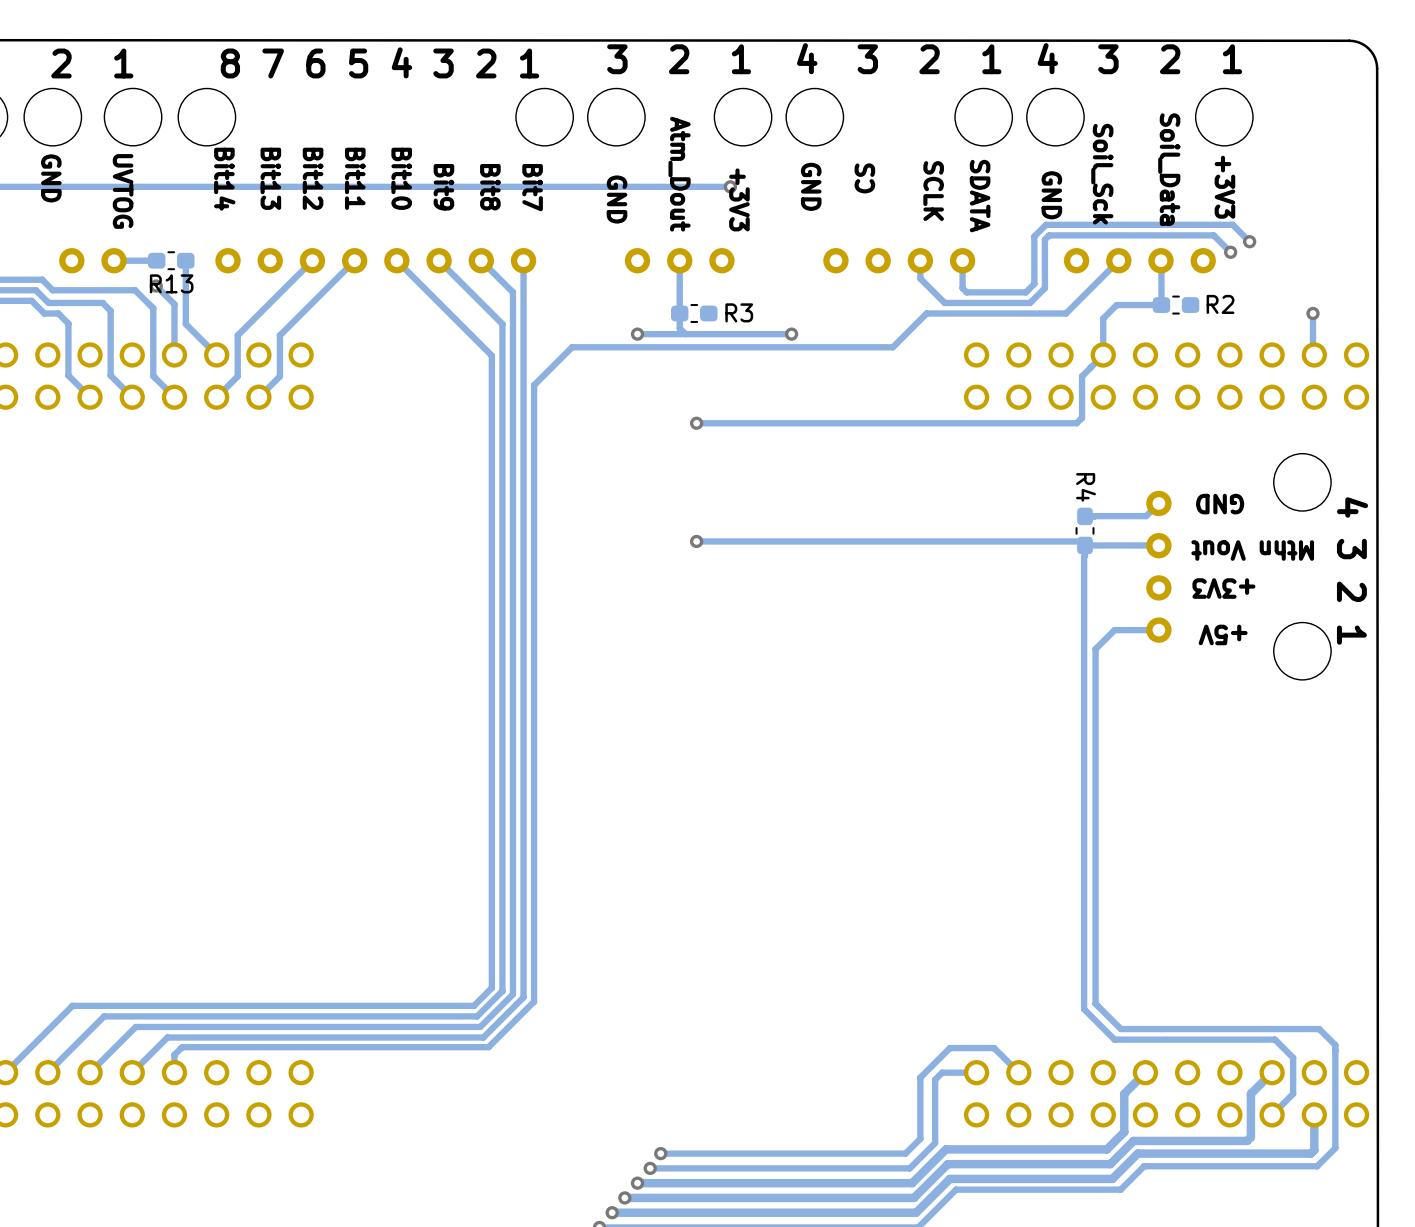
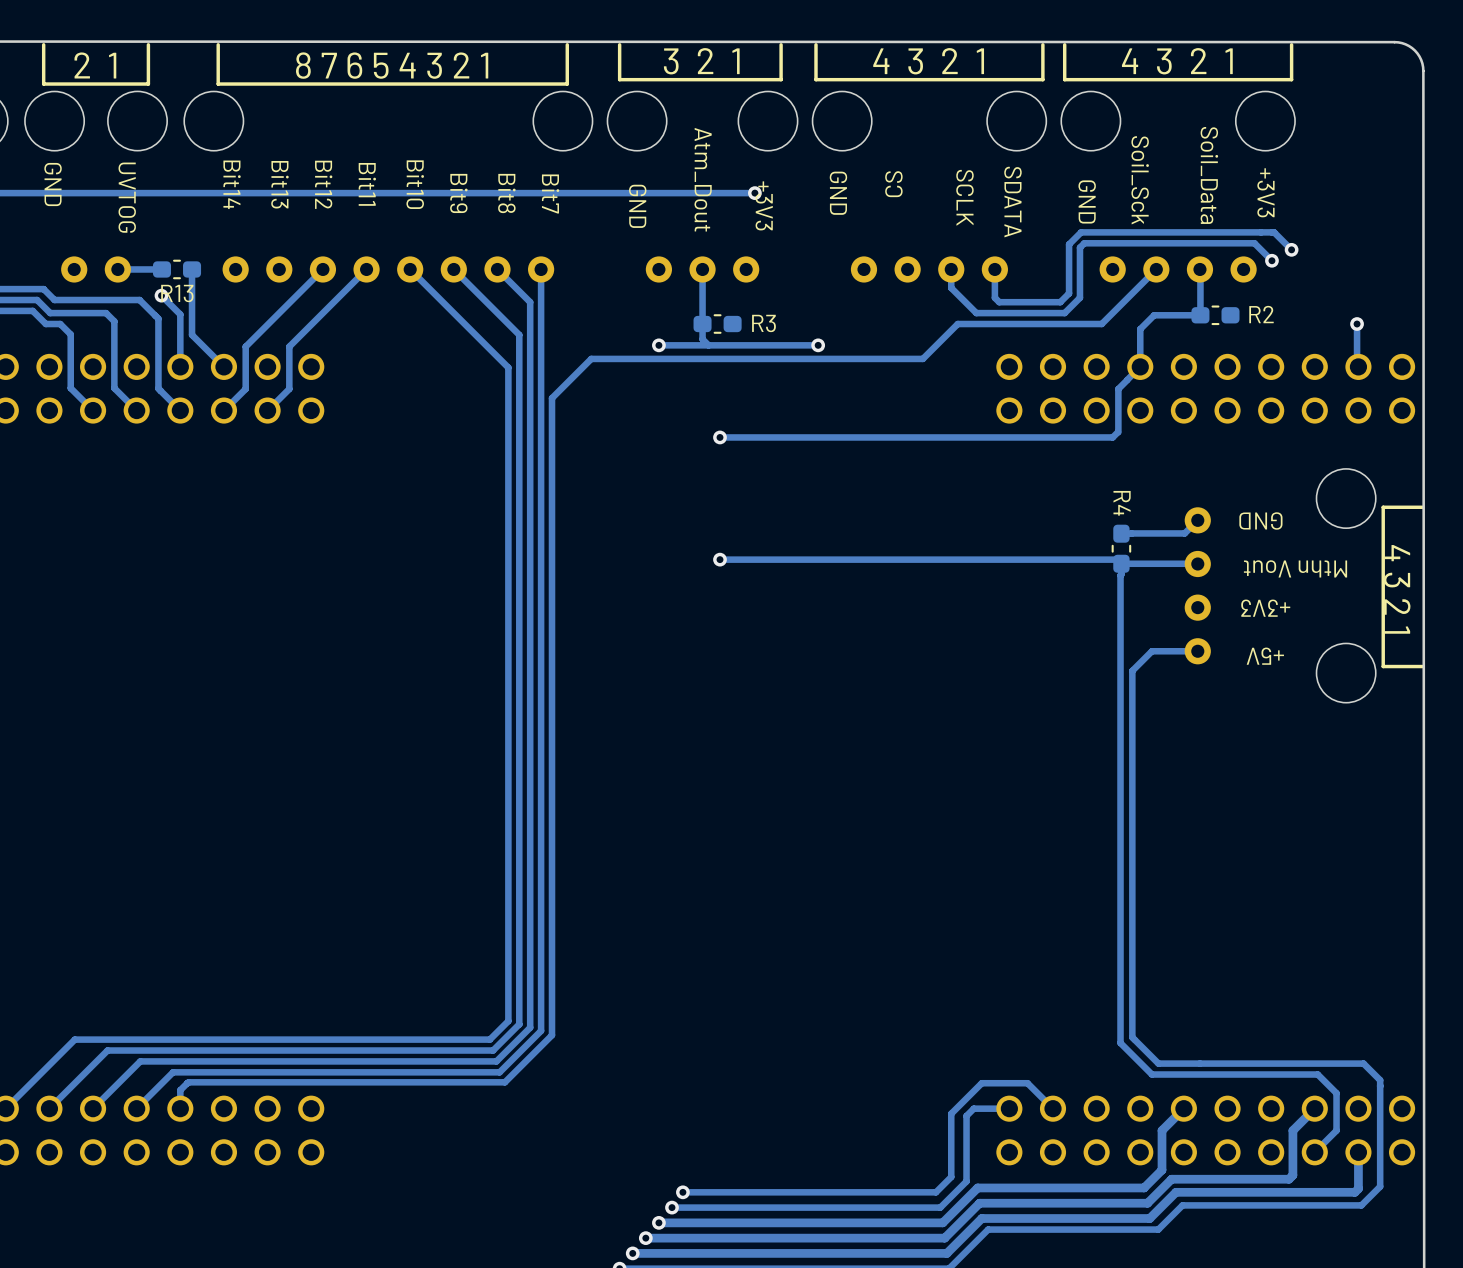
line: none -> (148, 44) (148, 84) (43, 84) (43, 44)
line: none -> (567, 44) (567, 84) (218, 84) (218, 44)
line: none -> (781, 44) (781, 79) (619, 79) (619, 44)
line: none -> (1042, 44) (1042, 79) (815, 79) (815, 44)
line: none -> (1291, 44) (1291, 79) (1064, 79) (1064, 44)
line: none -> (1422, 507) (1383, 507) (1383, 666) (1422, 666)

